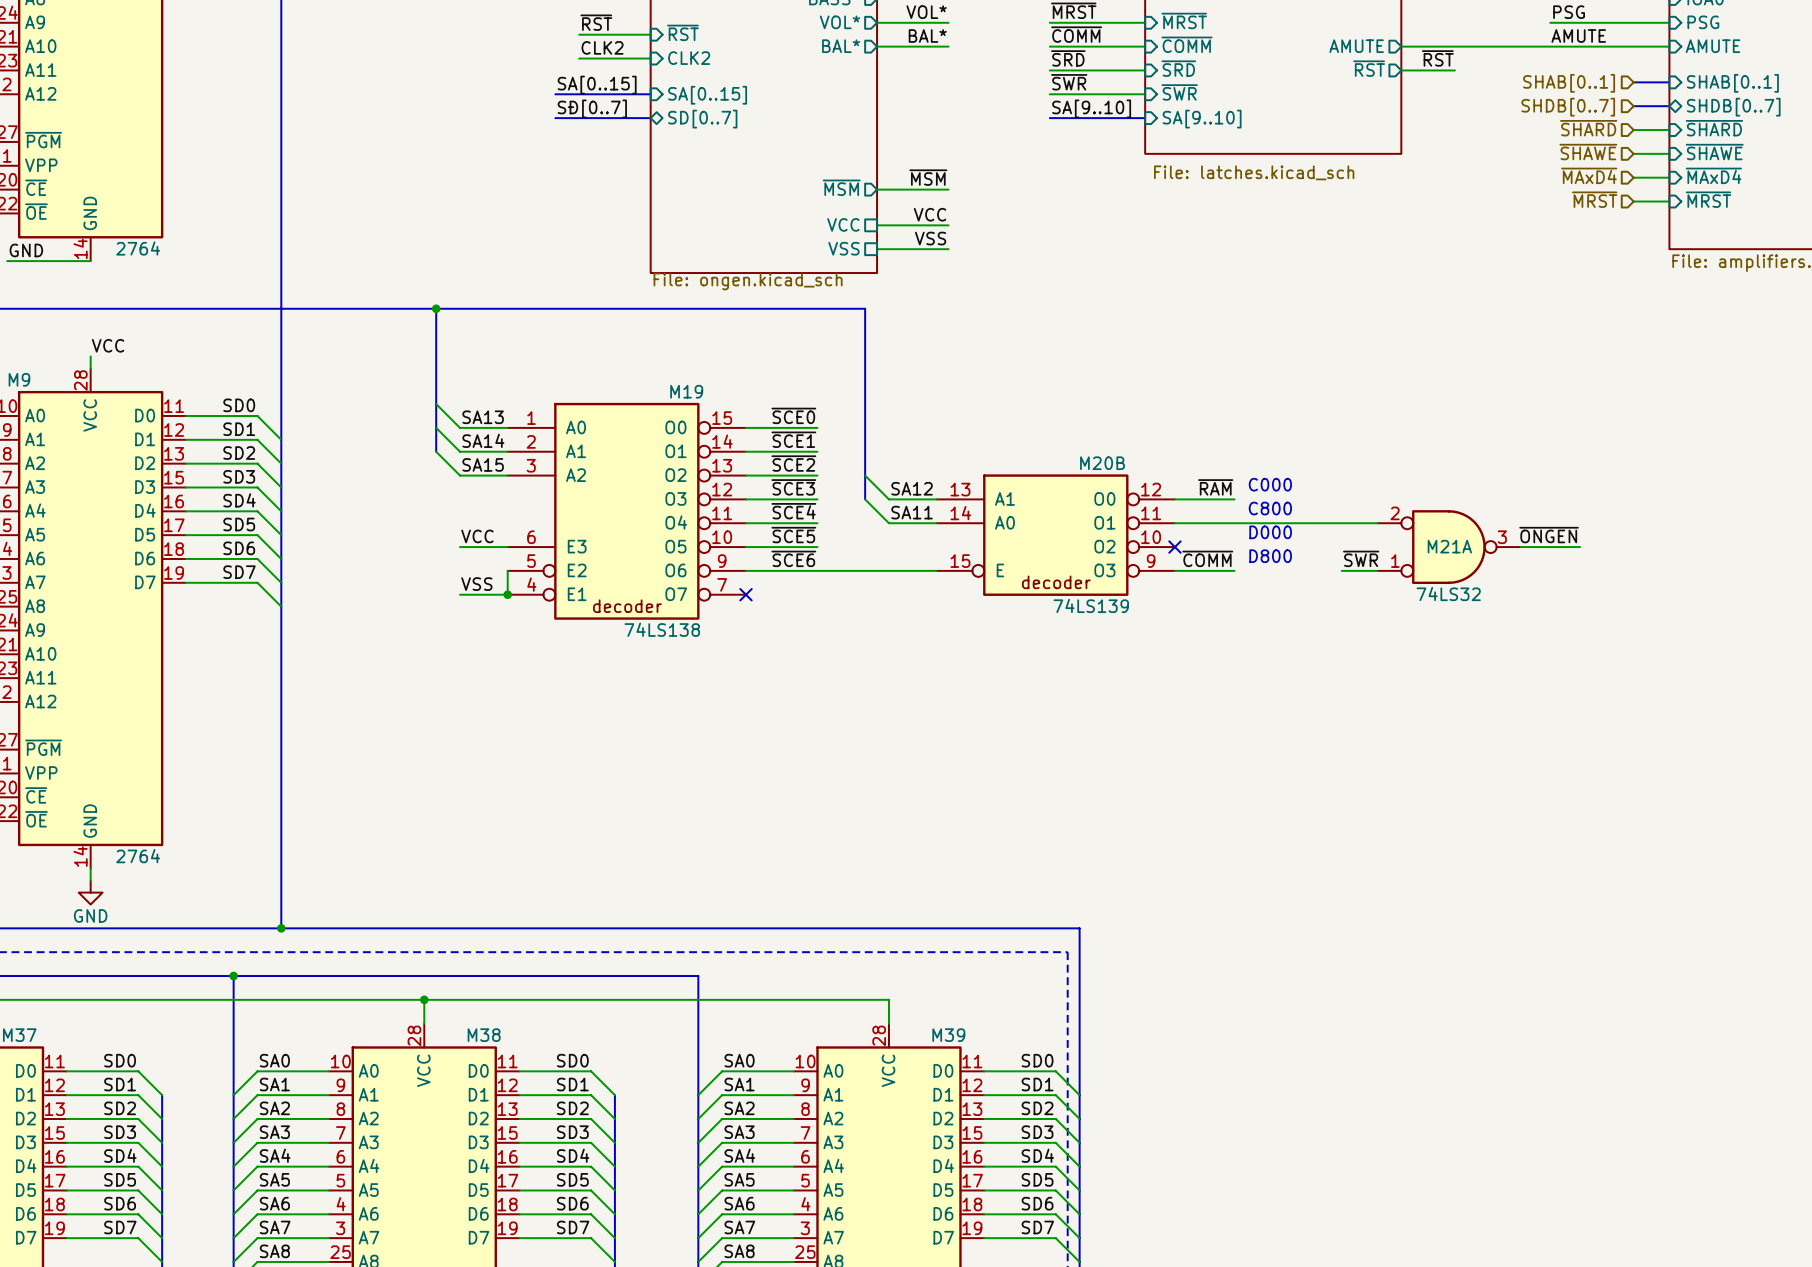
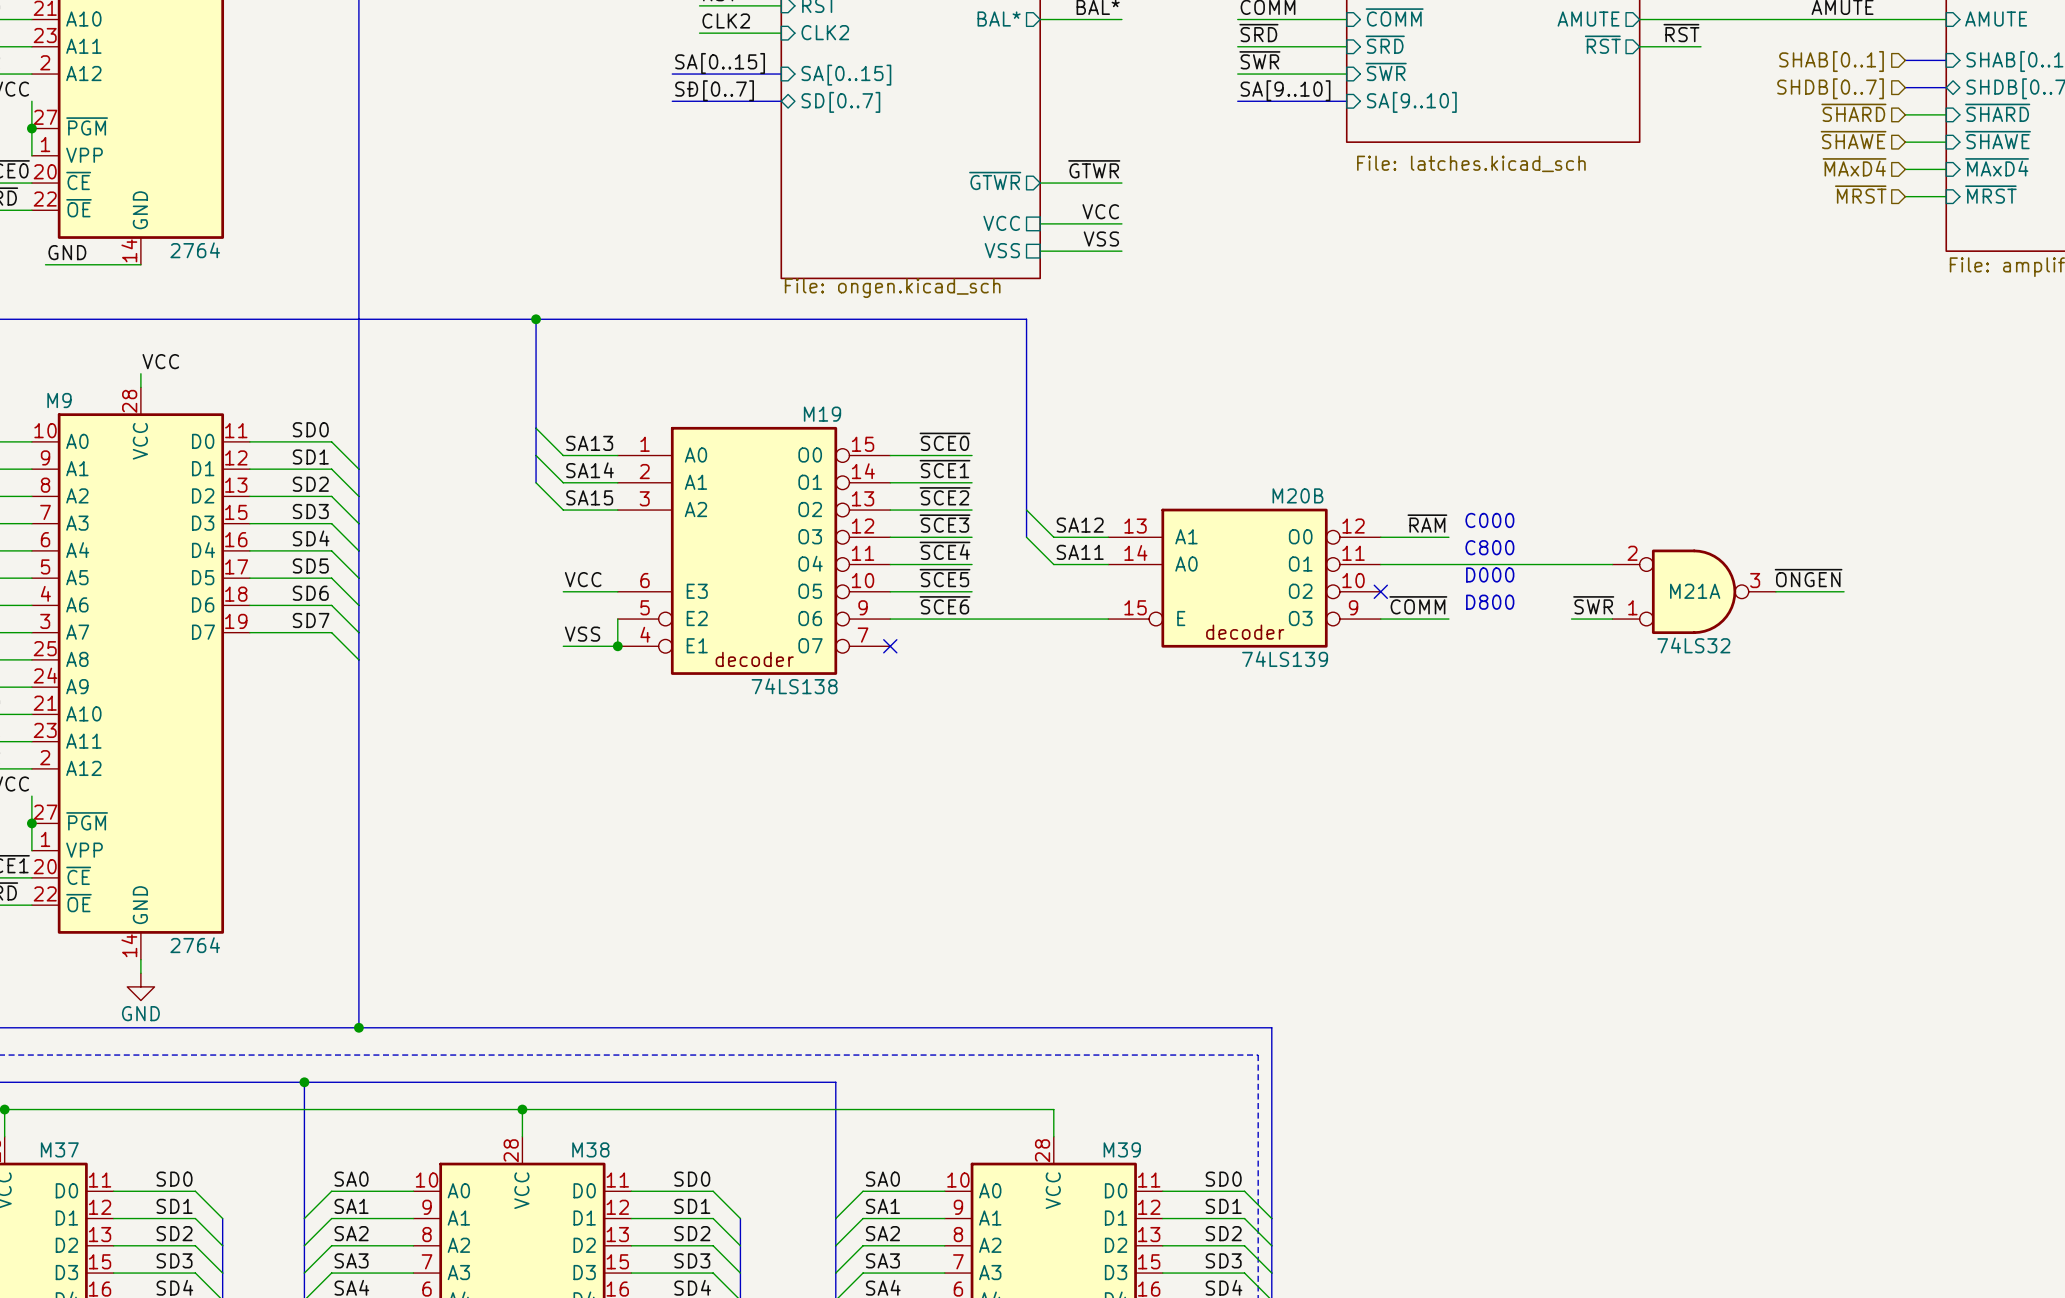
label: ~{MSM} (928, 177) -> ~{GTWR} (1094, 169)
sheet pin: ~{MSM} (841, 187) -> ~{GTWR} (995, 180)

